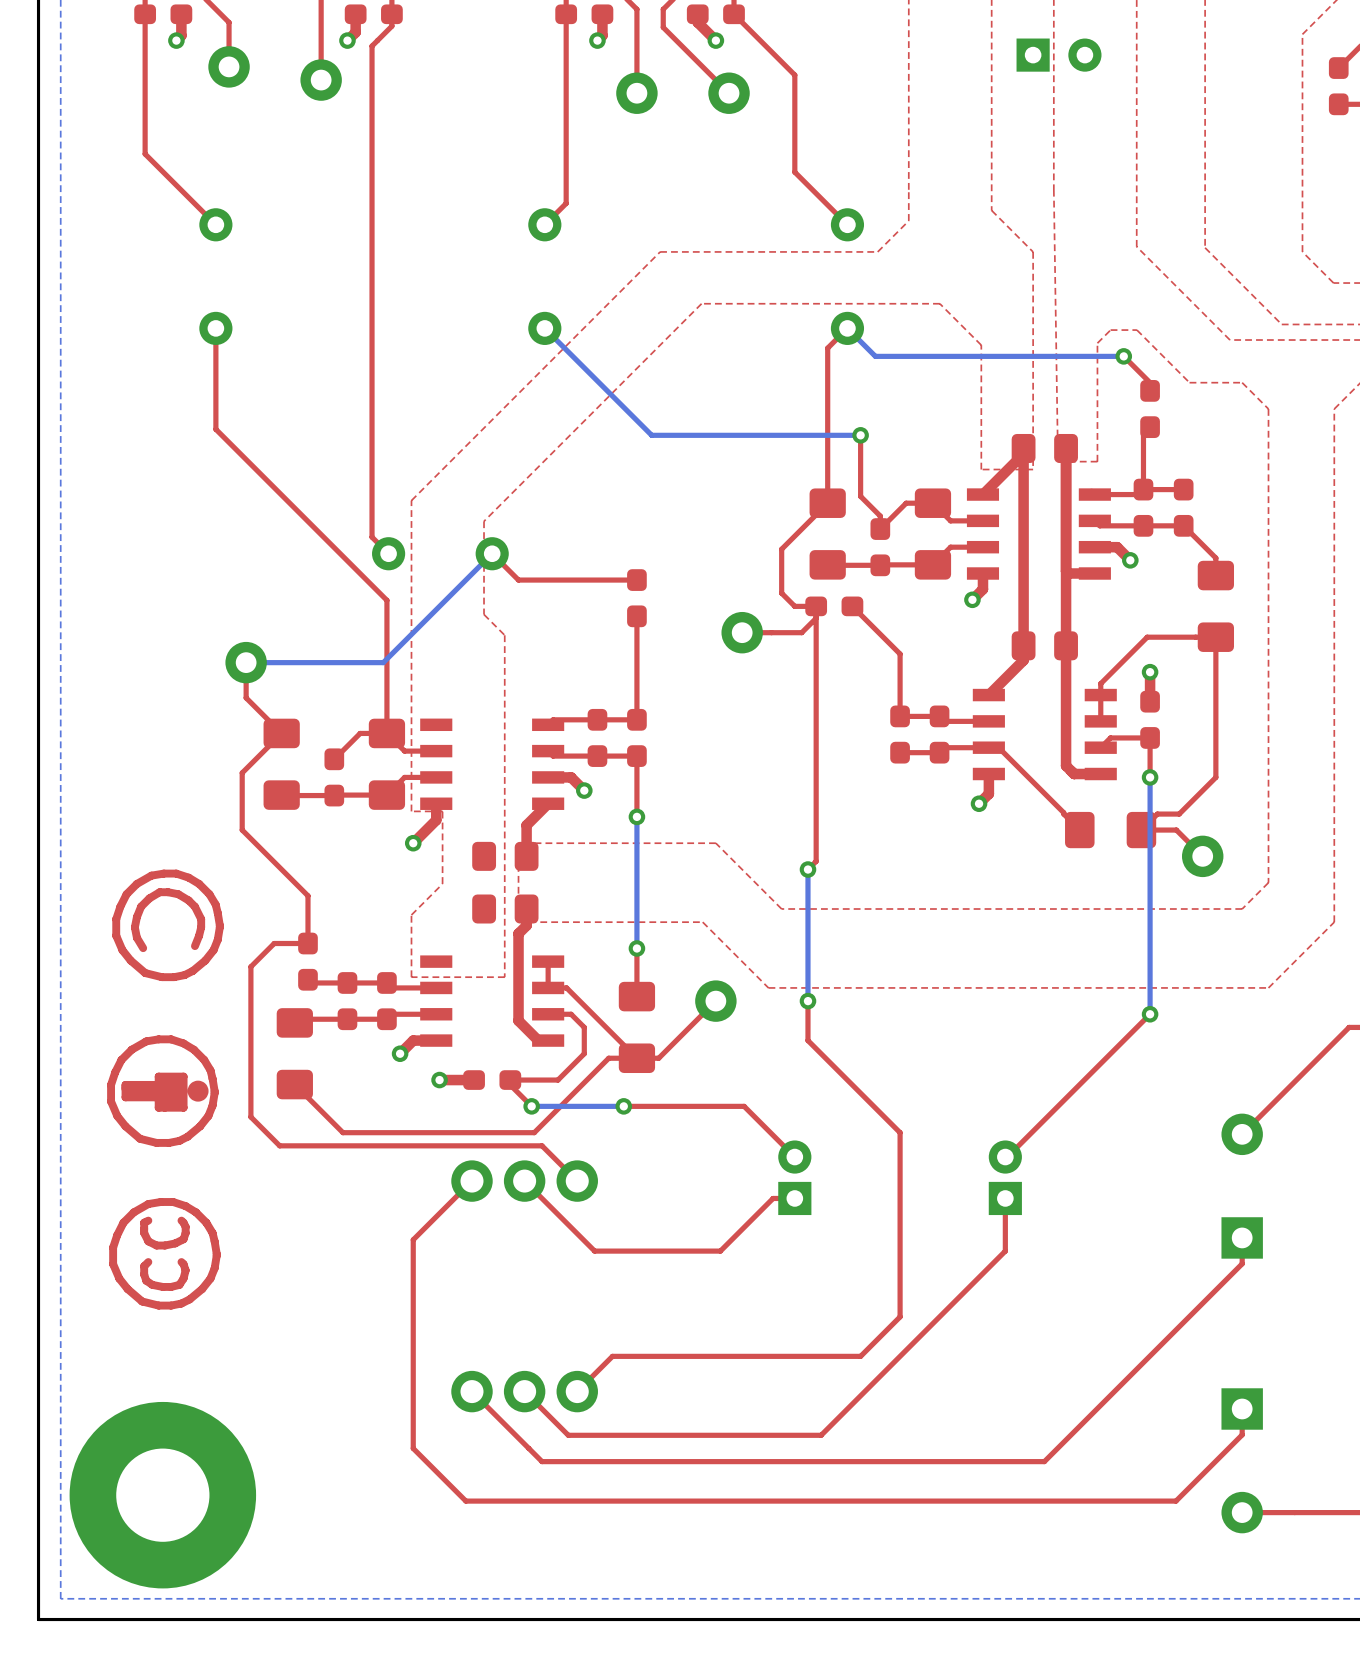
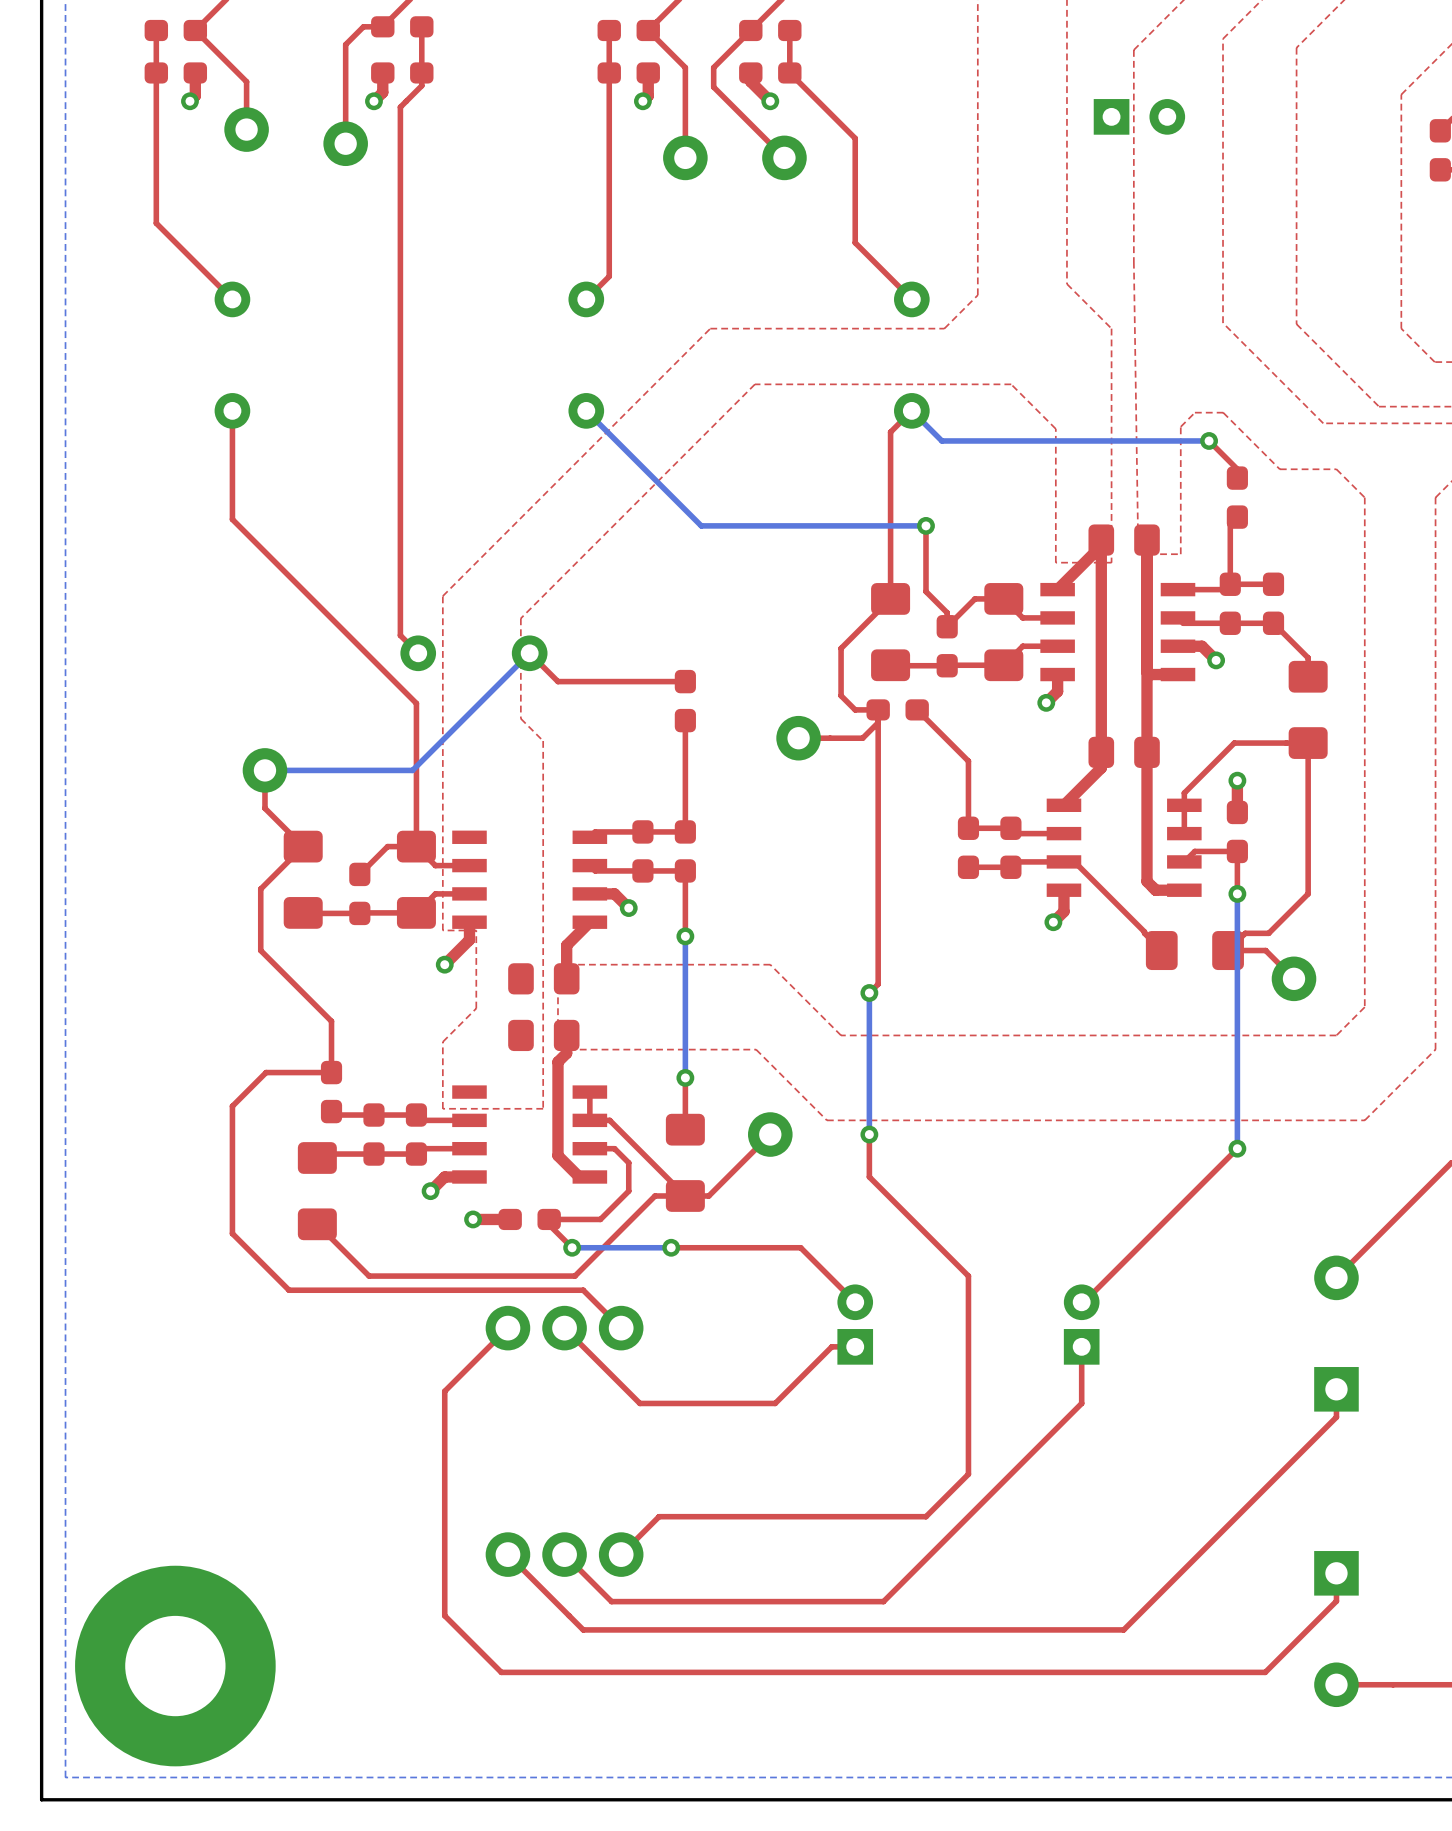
drawing: [112, 869, 224, 982] -> none
top track: (274, 943) (250, 966) (250, 1117) (279, 1145) -> (295, 1072) (266, 1072) (232, 1106) (232, 1233) (289, 1290) (301, 1290)
drawing: [107, 1035, 219, 1147] -> none
drawing: [109, 1198, 221, 1310] -> none

